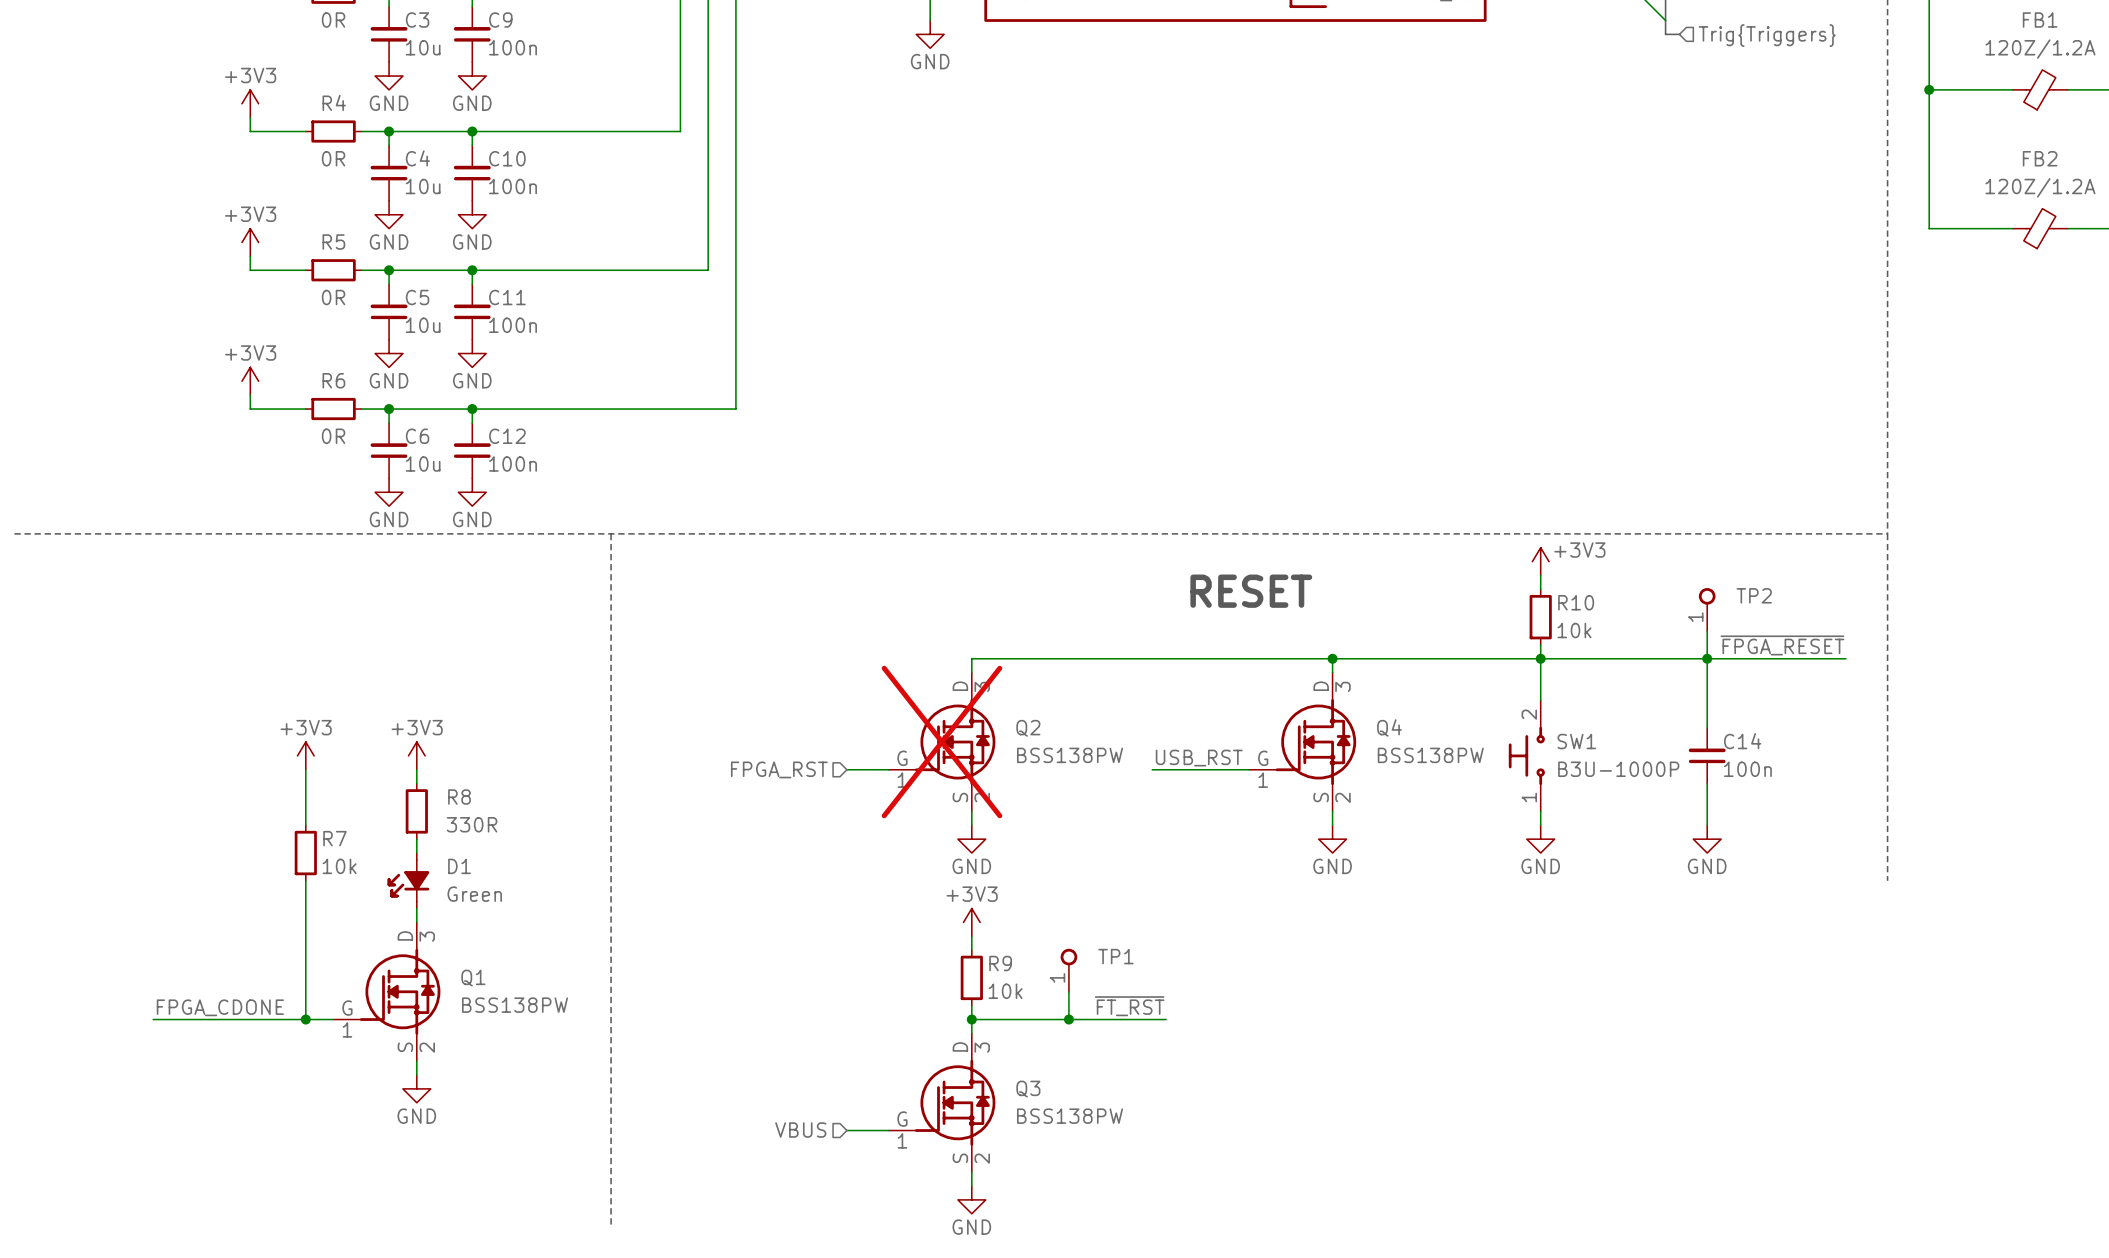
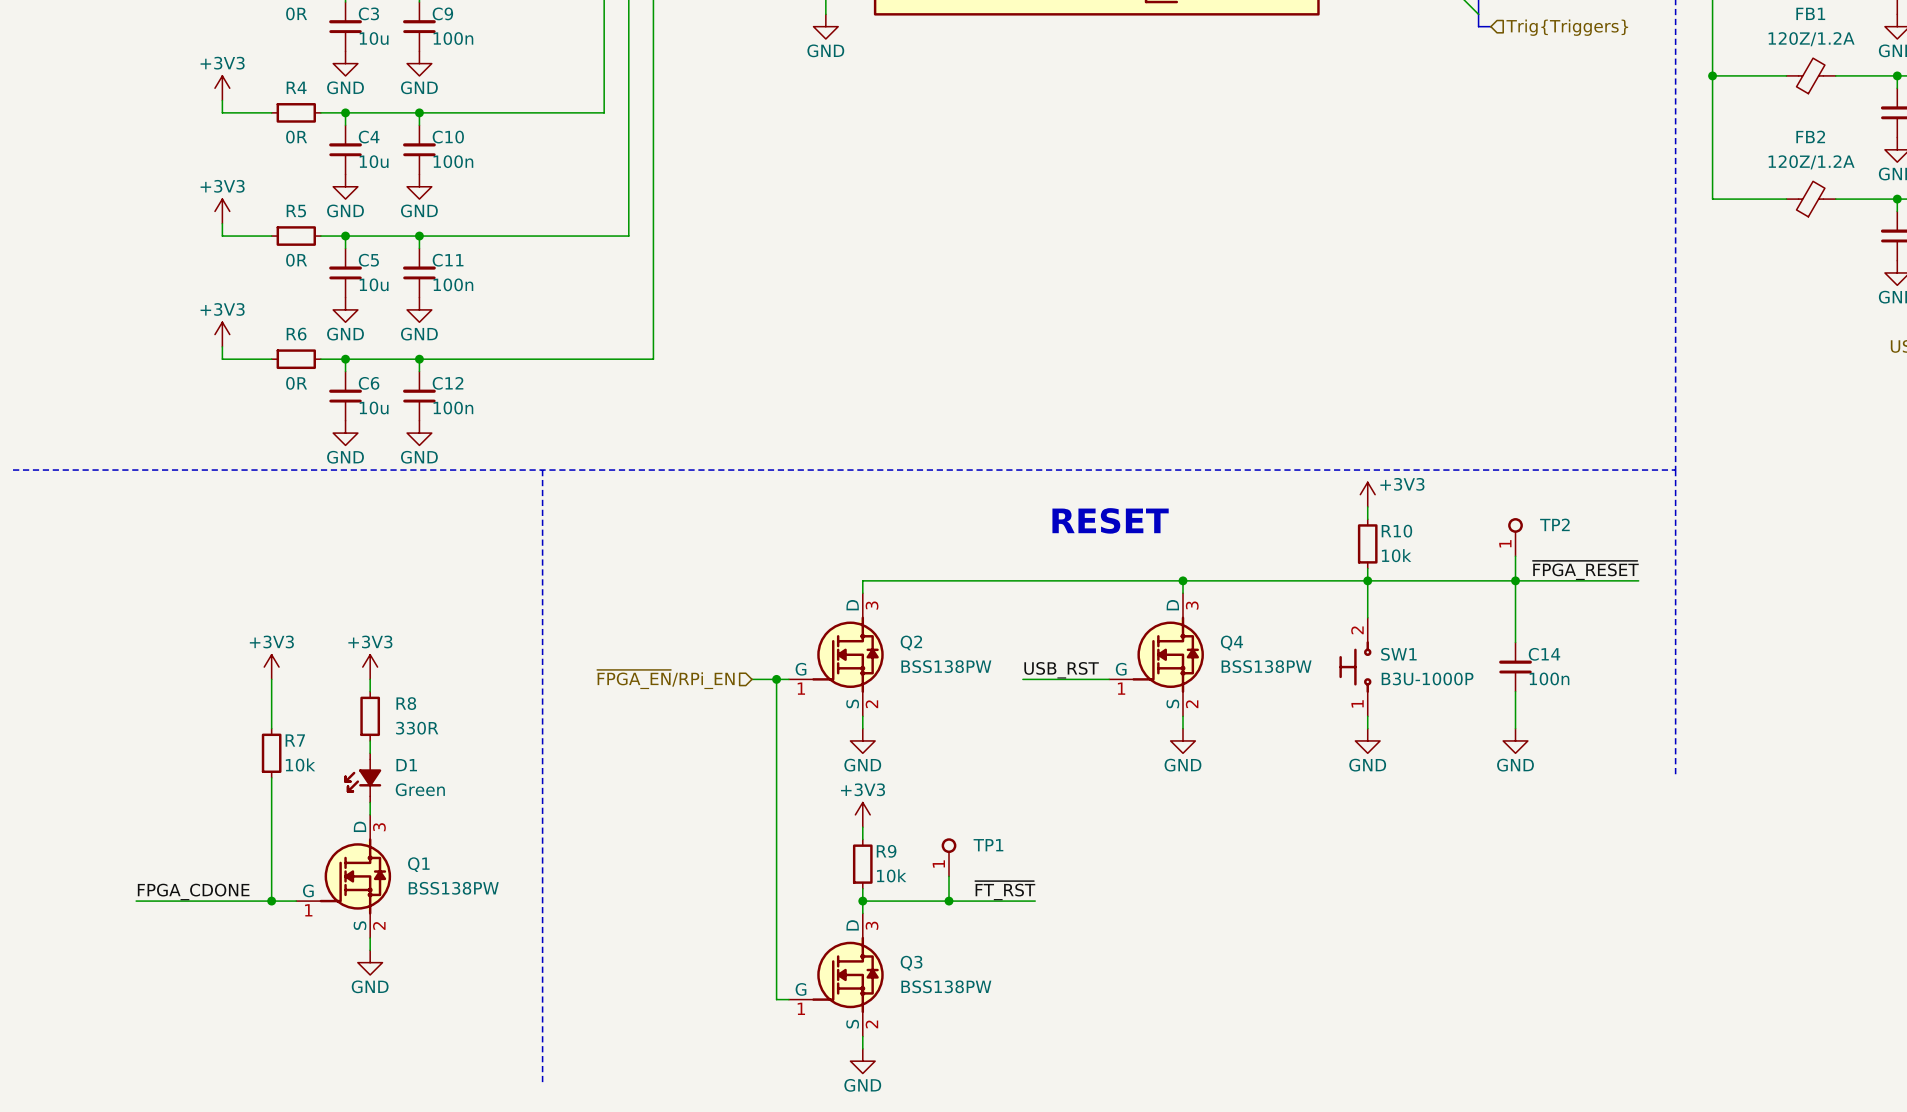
Q2 do-not-place cross: (941, 742) -> none
hierarchical label: FPGA_RST (779, 769) -> ~{FPGA_EN}/RPi_EN (665, 679)
junction: none -> (776, 679)
hierarchical label: VBUS (800, 1130) -> none
wire: (846, 1130) (874, 1130) -> (776, 679) (776, 999)

